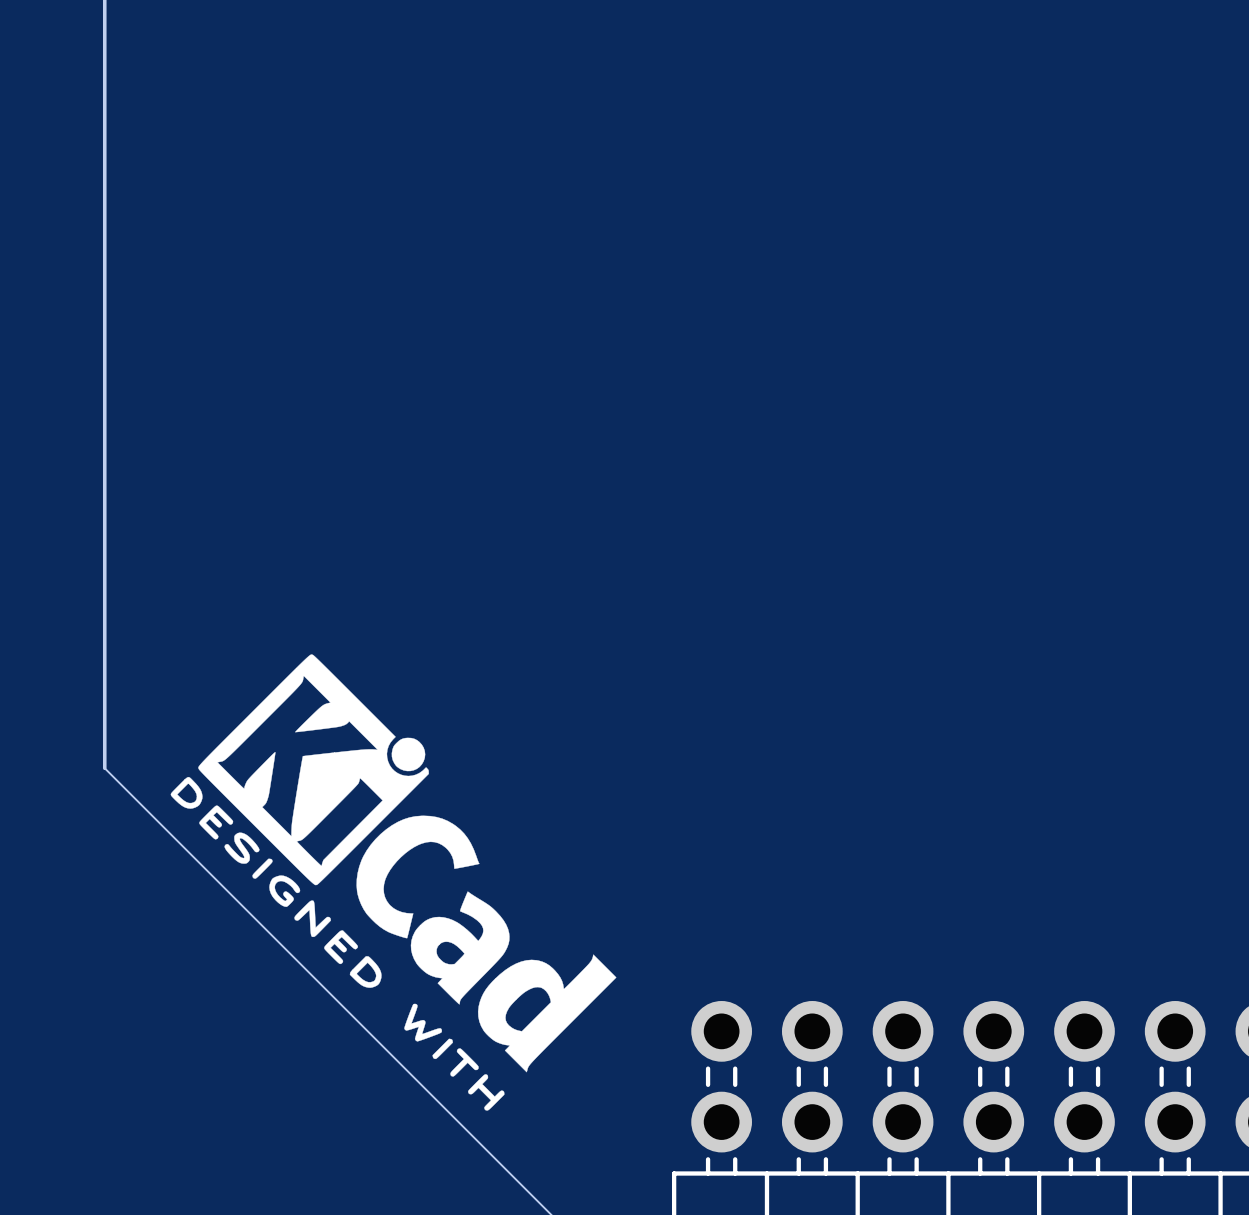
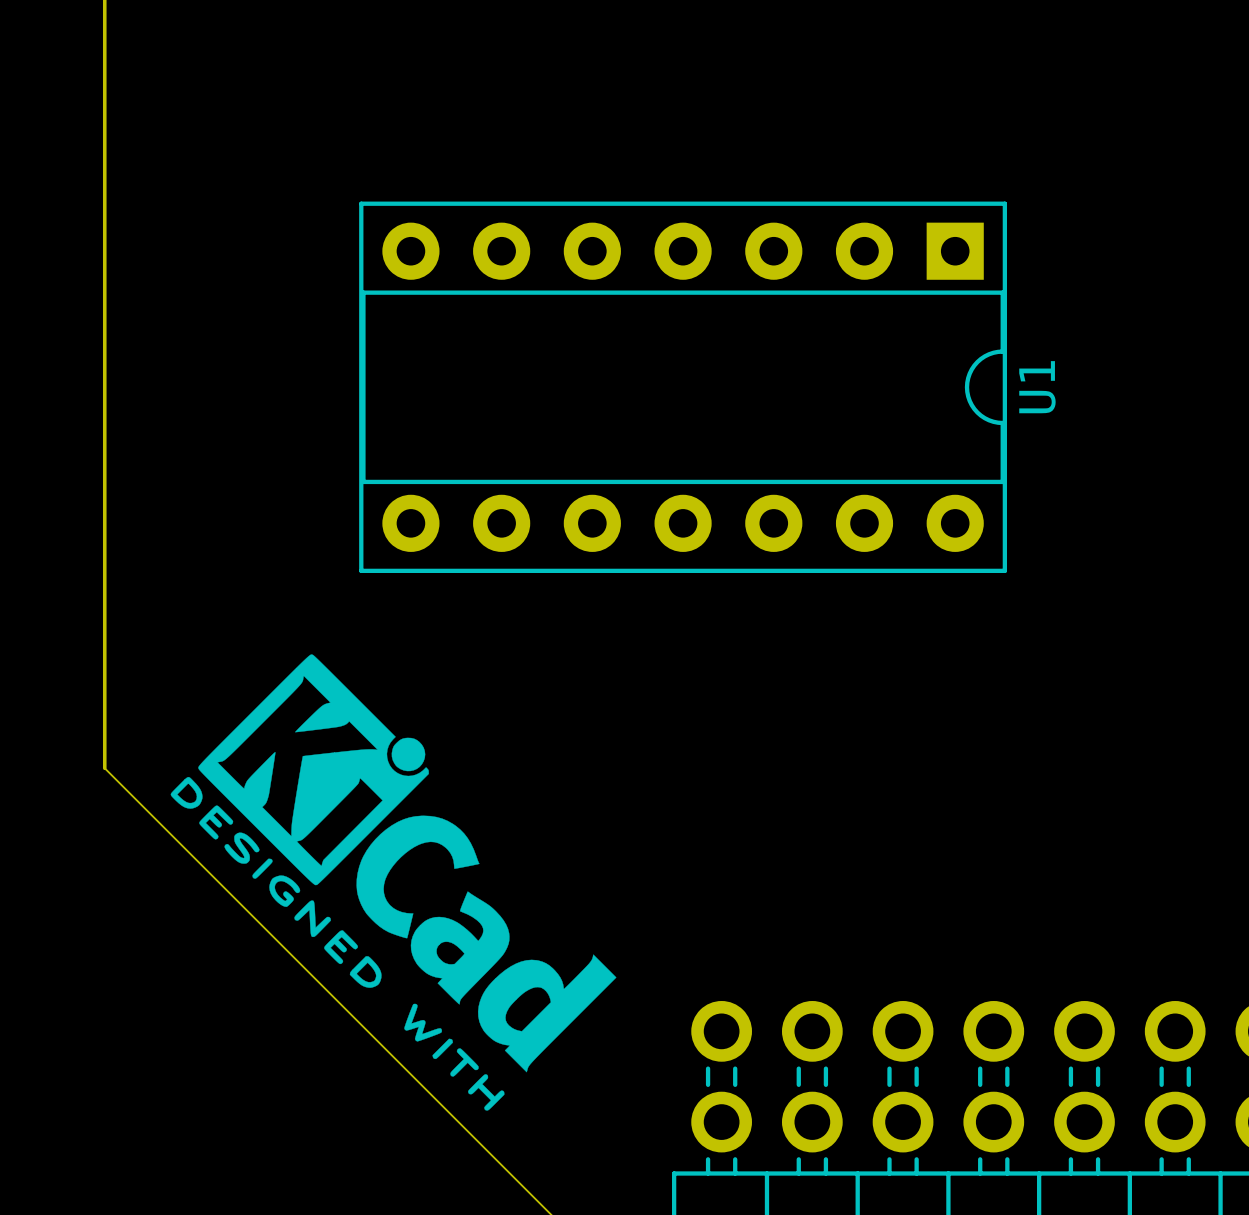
U1: none -> (683, 387)

